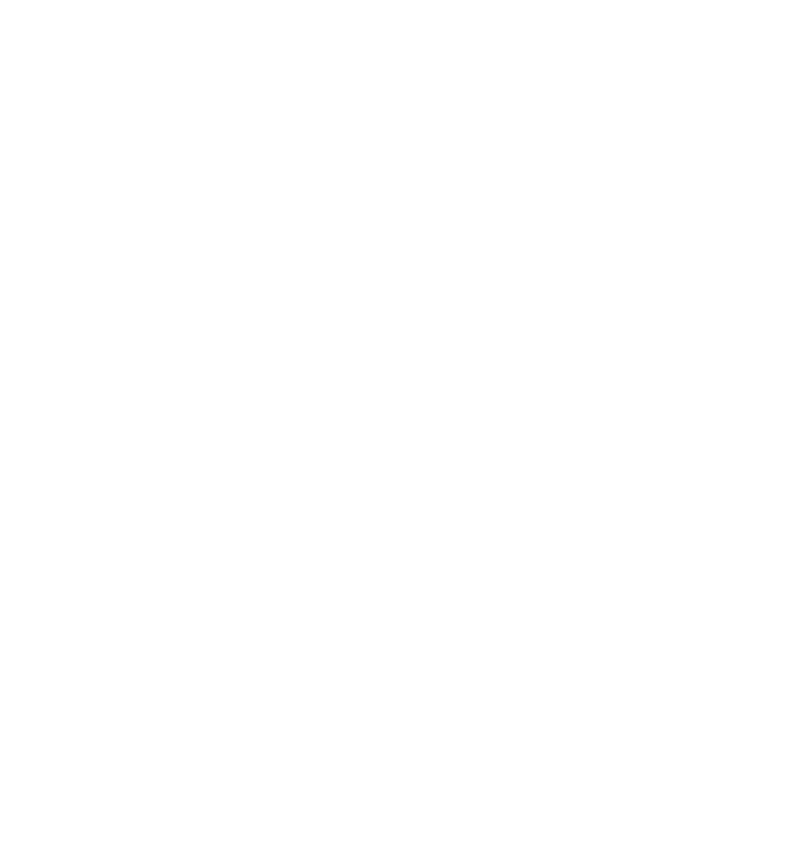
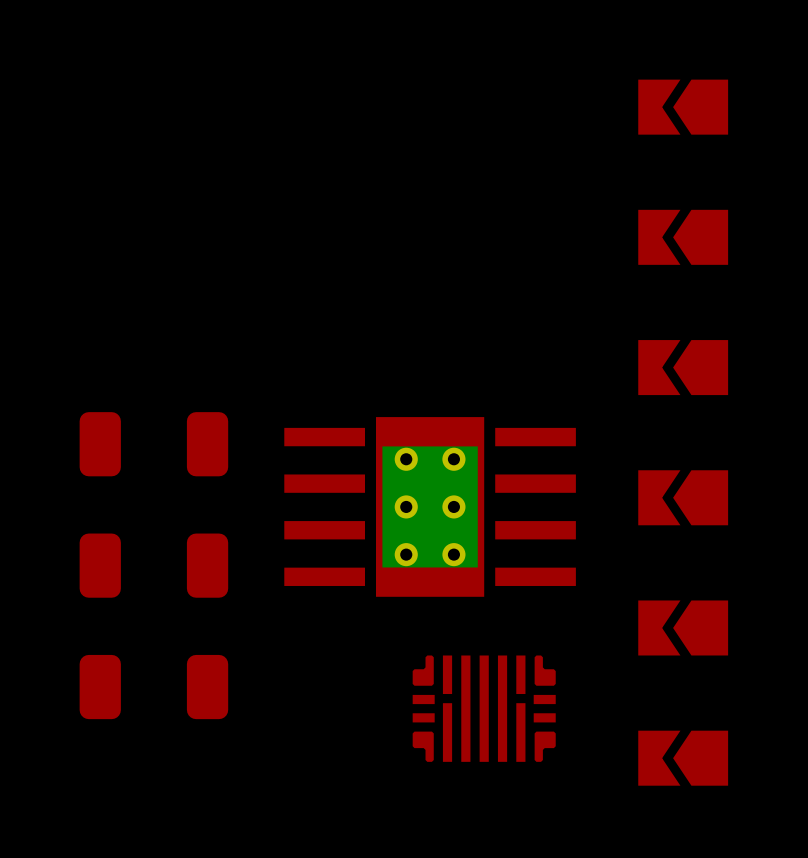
part: none -> (683, 107)
part: none -> (683, 237)
part: none -> (683, 367)
part: none -> (153, 444)
part: none -> (683, 497)
part: none -> (430, 506)
part: none -> (153, 565)
part: none -> (683, 627)
part: none -> (153, 687)
part: none -> (484, 708)
part: none -> (683, 758)

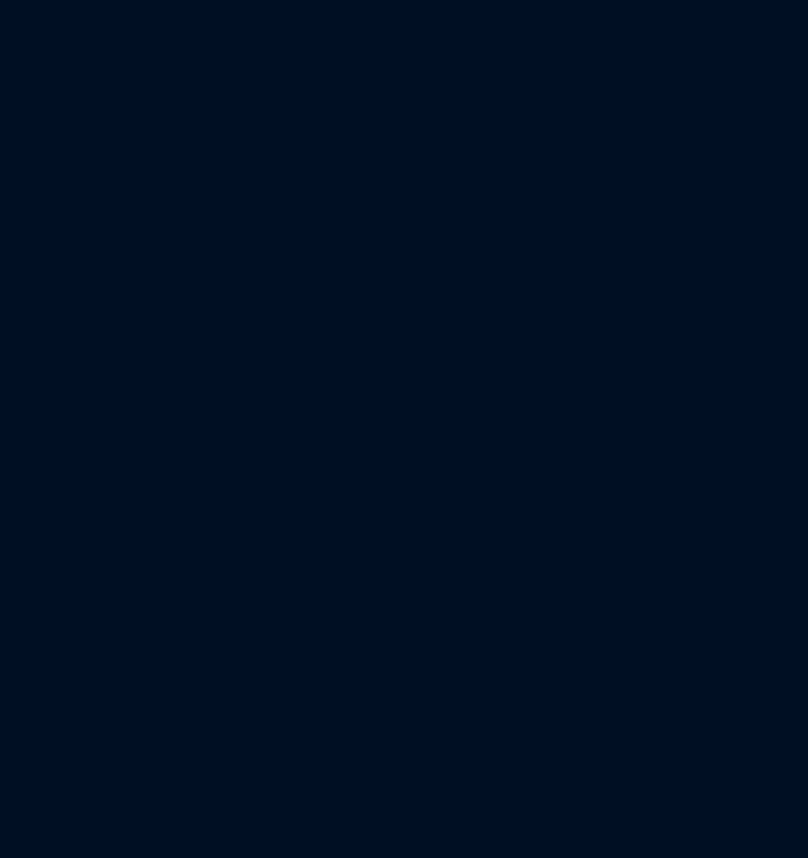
part: (683, 107) -> none
part: (683, 237) -> none
part: (683, 367) -> none
part: (153, 444) -> none
part: (683, 497) -> none
part: (430, 506) -> none
part: (153, 565) -> none
part: (683, 627) -> none
part: (153, 687) -> none
part: (484, 708) -> none
part: (683, 758) -> none

